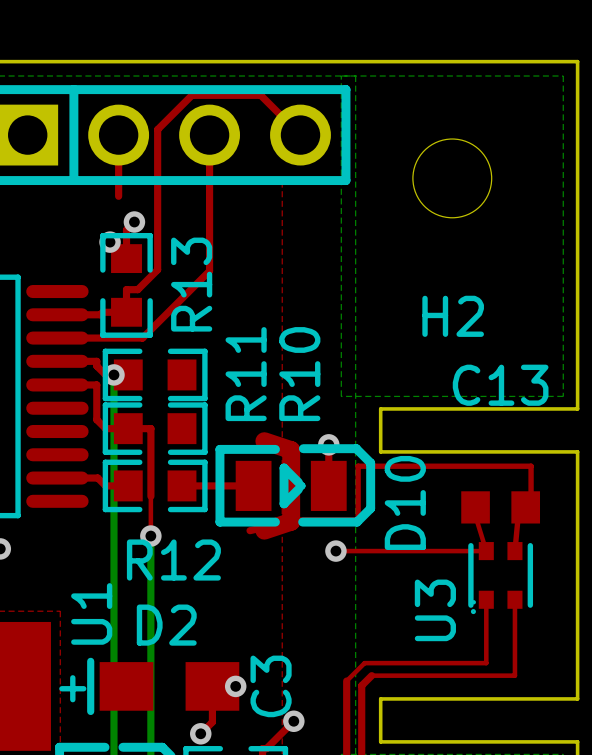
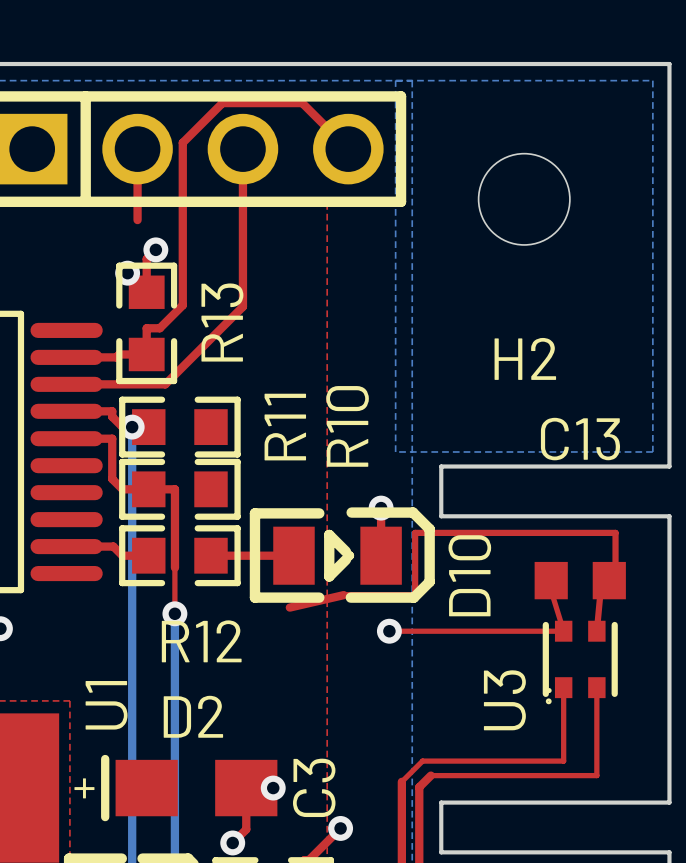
top track: (264, 441) (291, 450) (291, 521) (264, 530) -> none

